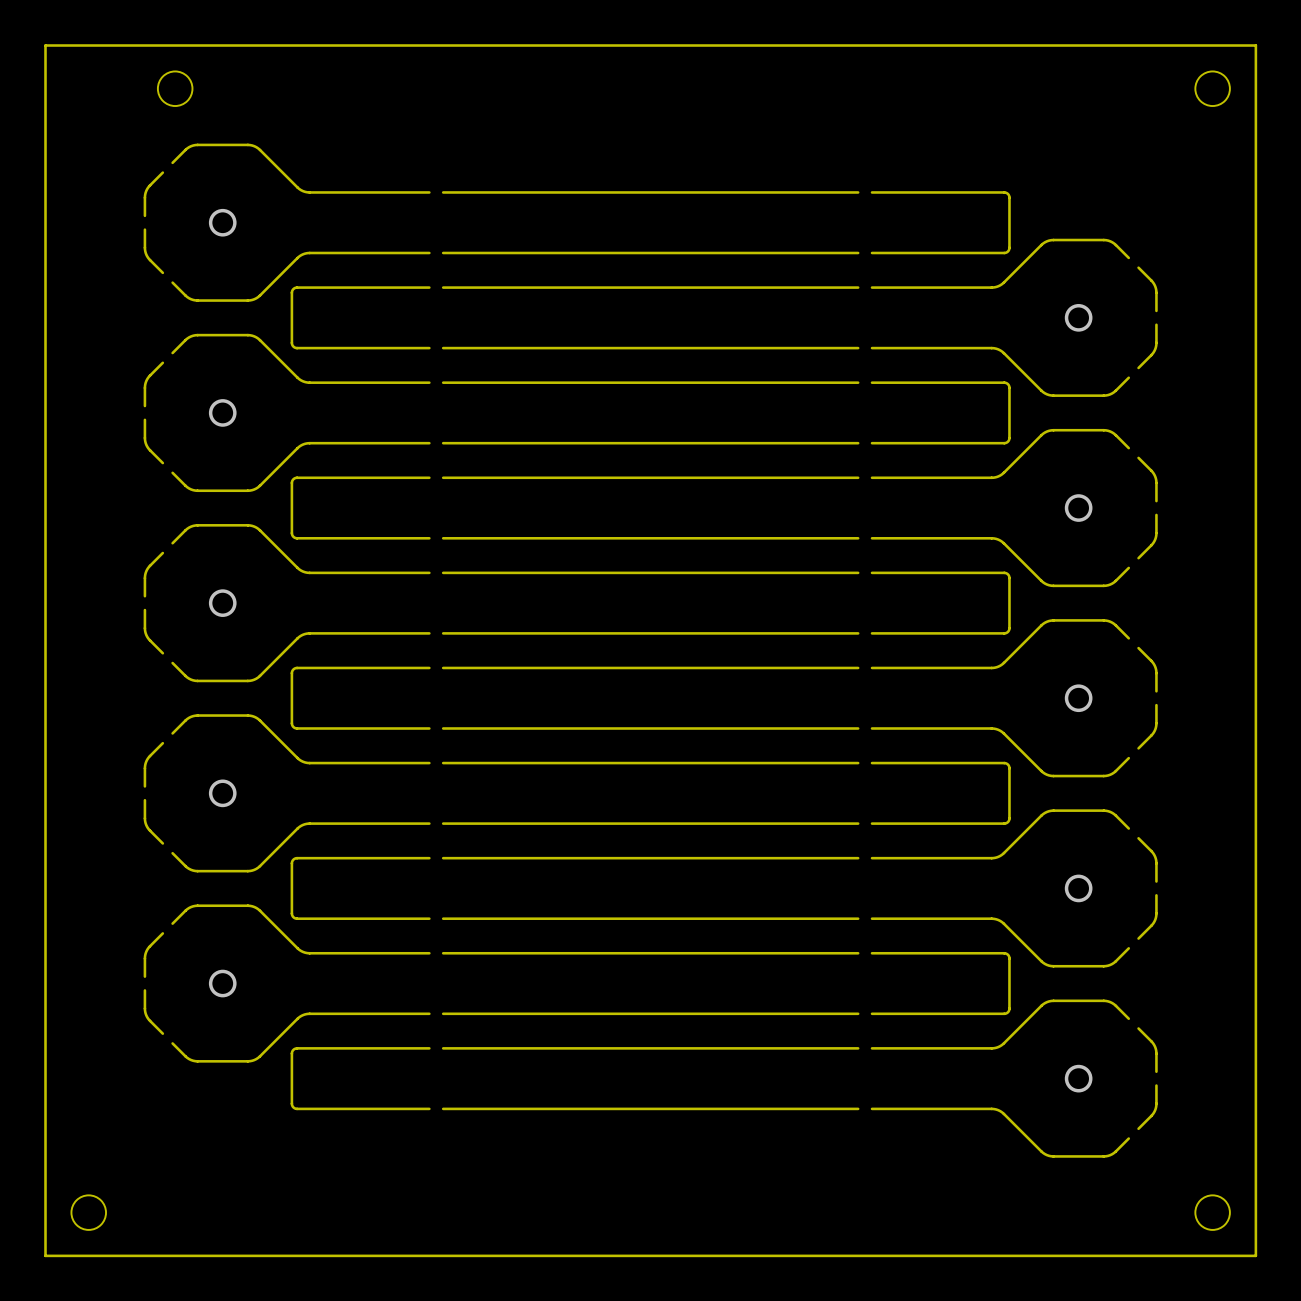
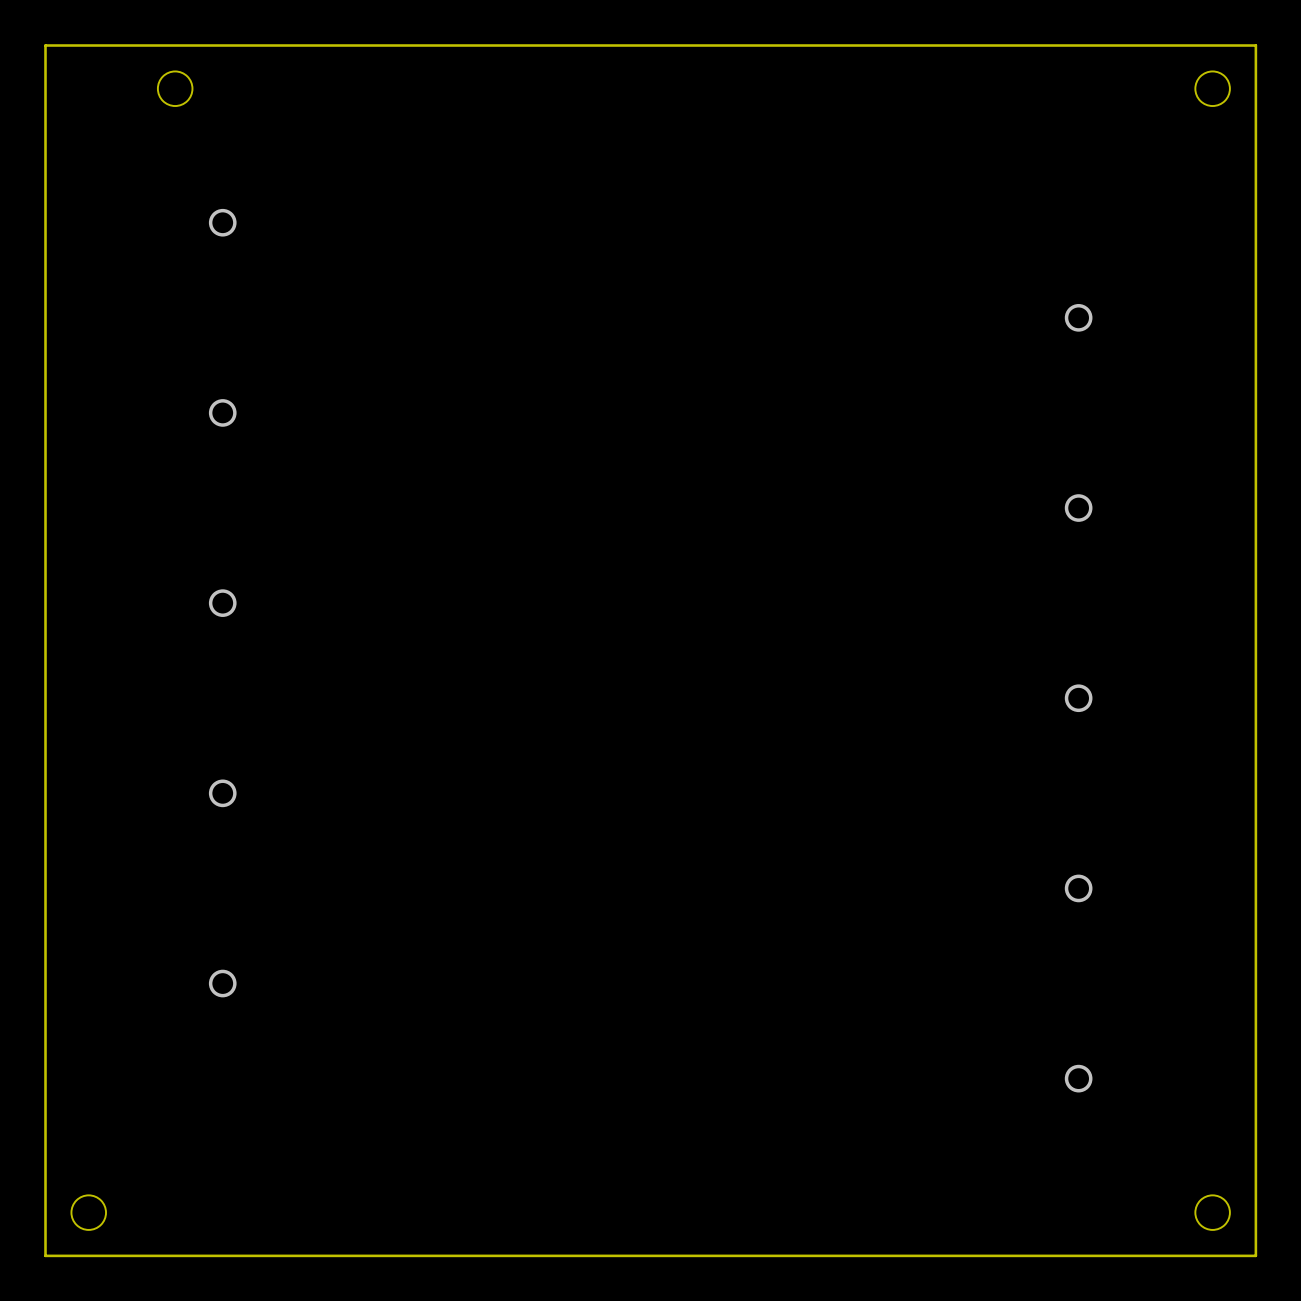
board edge: (172, 162) (187, 148) (193, 145) (250, 145) (258, 148) (297, 187) (305, 191) (429, 192) -> none
board edge: (162, 172) (146, 191) (144, 215) -> none
board edge: (858, 192) (443, 192) -> none
board edge: (872, 192) (1004, 192) (1007, 193) (1009, 197) (1009, 247) (1006, 252) (872, 252) -> none
board edge: (144, 229) (146, 254) (162, 272) -> none
board edge: (429, 252) (304, 253) (297, 258) (258, 297) (250, 300) (193, 299) (187, 296) (172, 282) -> none
board edge: (858, 252) (443, 252) -> none
board edge: (1128, 257) (1114, 243) (1108, 240) (1051, 240) (1043, 243) (1003, 282) (996, 286) (872, 287) -> none
board edge: (1138, 267) (1155, 286) (1156, 310) -> none
board edge: (429, 287) (297, 287) (293, 289) (291, 292) (291, 342) (295, 347) (429, 348) -> none
board edge: (858, 287) (443, 287) -> none
board edge: (1156, 324) (1155, 349) (1138, 367) -> none
board edge: (858, 348) (443, 348) -> none
board edge: (872, 348) (996, 348) (1003, 353) (1043, 392) (1051, 395) (1108, 395) (1114, 392) (1128, 377) -> none
board edge: (172, 353) (187, 338) (193, 335) (250, 335) (258, 338) (297, 377) (305, 382) (429, 382) -> none
board edge: (162, 362) (146, 381) (144, 406) -> none
board edge: (858, 382) (443, 382) -> none
board edge: (872, 382) (1004, 382) (1007, 384) (1009, 387) (1009, 438) (1006, 442) (872, 443) -> none
board edge: (144, 419) (146, 444) (162, 463) -> none
board edge: (429, 443) (304, 443) (297, 448) (258, 487) (250, 490) (193, 490) (187, 487) (172, 472) -> none
board edge: (858, 443) (443, 443) -> none
board edge: (1128, 448) (1114, 433) (1108, 430) (1051, 430) (1043, 433) (1003, 472) (996, 477) (872, 477) -> none
board edge: (1138, 457) (1155, 476) (1156, 501) -> none
board edge: (429, 477) (297, 477) (293, 479) (291, 482) (291, 533) (295, 537) (429, 538) -> none
board edge: (858, 477) (443, 477) -> none
board edge: (1156, 514) (1155, 539) (1138, 558) -> none
board edge: (858, 538) (443, 538) -> none
board edge: (872, 538) (996, 538) (1003, 543) (1043, 582) (1051, 585) (1108, 585) (1114, 582) (1128, 567) -> none
board edge: (172, 543) (187, 528) (193, 525) (250, 525) (258, 528) (297, 567) (305, 572) (429, 572) -> none
board edge: (162, 553) (146, 571) (144, 596) -> none
board edge: (858, 572) (443, 572) -> none
board edge: (872, 572) (1004, 572) (1007, 574) (1009, 578) (1009, 628) (1006, 633) (872, 633) -> none
board edge: (144, 610) (146, 634) (162, 653) -> none
board edge: (429, 633) (304, 634) (297, 638) (258, 677) (250, 680) (193, 680) (187, 677) (172, 663) -> none
board edge: (858, 633) (443, 633) -> none
board edge: (1128, 638) (1114, 624) (1108, 621) (1051, 620) (1043, 623) (1003, 662) (996, 667) (872, 667) -> none
board edge: (1138, 648) (1155, 666) (1156, 691) -> none
board edge: (429, 667) (297, 667) (293, 669) (291, 673) (291, 723) (295, 728) (429, 728) -> none
board edge: (858, 667) (443, 667) -> none
board edge: (1156, 705) (1155, 729) (1138, 748) -> none
board edge: (858, 728) (443, 728) -> none
board edge: (872, 728) (996, 729) (1003, 733) (1043, 772) (1051, 775) (1108, 775) (1114, 772) (1128, 758) -> none
board edge: (172, 733) (187, 719) (193, 716) (250, 715) (258, 719) (297, 758) (305, 762) (429, 763) -> none
board edge: (162, 743) (146, 761) (144, 786) -> none
board edge: (858, 763) (443, 763) -> none
board edge: (872, 763) (1004, 763) (1007, 764) (1009, 768) (1009, 818) (1006, 823) (872, 823) -> none
board edge: (144, 800) (146, 825) (162, 843) -> none
board edge: (429, 823) (304, 824) (297, 828) (258, 867) (250, 871) (193, 870) (187, 867) (172, 853) -> none
board edge: (858, 823) (443, 823) -> none
board edge: (1128, 828) (1114, 814) (1108, 811) (1051, 810) (1043, 814) (1003, 853) (996, 857) (872, 858) -> none
board edge: (1138, 838) (1155, 856) (1156, 881) -> none
board edge: (429, 858) (297, 858) (293, 859) (291, 863) (291, 913) (295, 918) (429, 918) -> none
board edge: (858, 858) (443, 858) -> none
board edge: (1156, 895) (1155, 920) (1138, 938) -> none
board edge: (858, 918) (443, 918) -> none
board edge: (872, 918) (996, 919) (1003, 923) (1043, 962) (1051, 966) (1108, 965) (1114, 962) (1128, 948) -> none
board edge: (172, 923) (187, 909) (193, 906) (250, 905) (258, 909) (297, 948) (305, 952) (429, 953) -> none
board edge: (162, 933) (146, 951) (144, 976) -> none
board edge: (858, 953) (443, 953) -> none
board edge: (872, 953) (1004, 953) (1007, 954) (1009, 958) (1009, 1008) (1006, 1013) (872, 1013) -> none
board edge: (144, 990) (146, 1015) (162, 1033) -> none
board edge: (429, 1013) (304, 1014) (297, 1018) (258, 1057) (250, 1061) (193, 1060) (187, 1057) (172, 1043) -> none
board edge: (858, 1013) (443, 1013) -> none
board edge: (1128, 1018) (1114, 1004) (1108, 1001) (1051, 1000) (1043, 1004) (1003, 1043) (996, 1047) (872, 1048) -> none
board edge: (1138, 1028) (1155, 1046) (1156, 1071) -> none
board edge: (429, 1048) (297, 1048) (293, 1049) (291, 1053) (291, 1103) (295, 1108) (429, 1108) -> none
board edge: (858, 1048) (443, 1048) -> none
board edge: (1156, 1085) (1155, 1110) (1138, 1128) -> none
board edge: (858, 1108) (443, 1108) -> none
board edge: (872, 1108) (996, 1109) (1003, 1113) (1043, 1152) (1051, 1156) (1108, 1155) (1114, 1152) (1128, 1138) -> none

